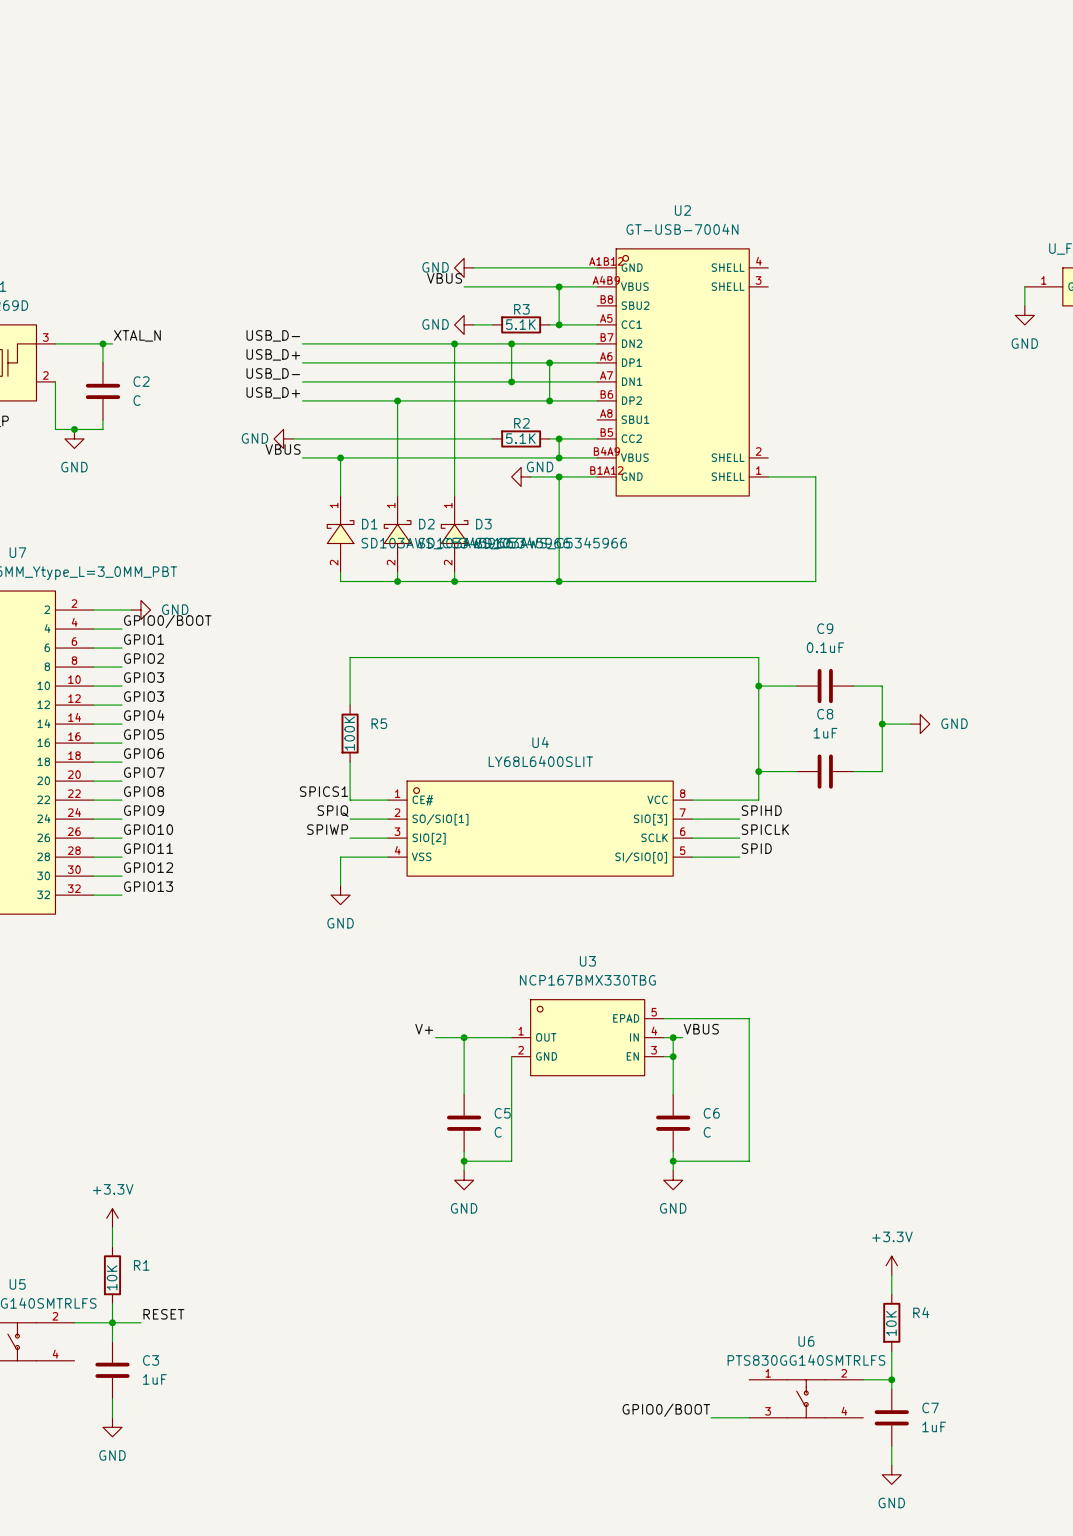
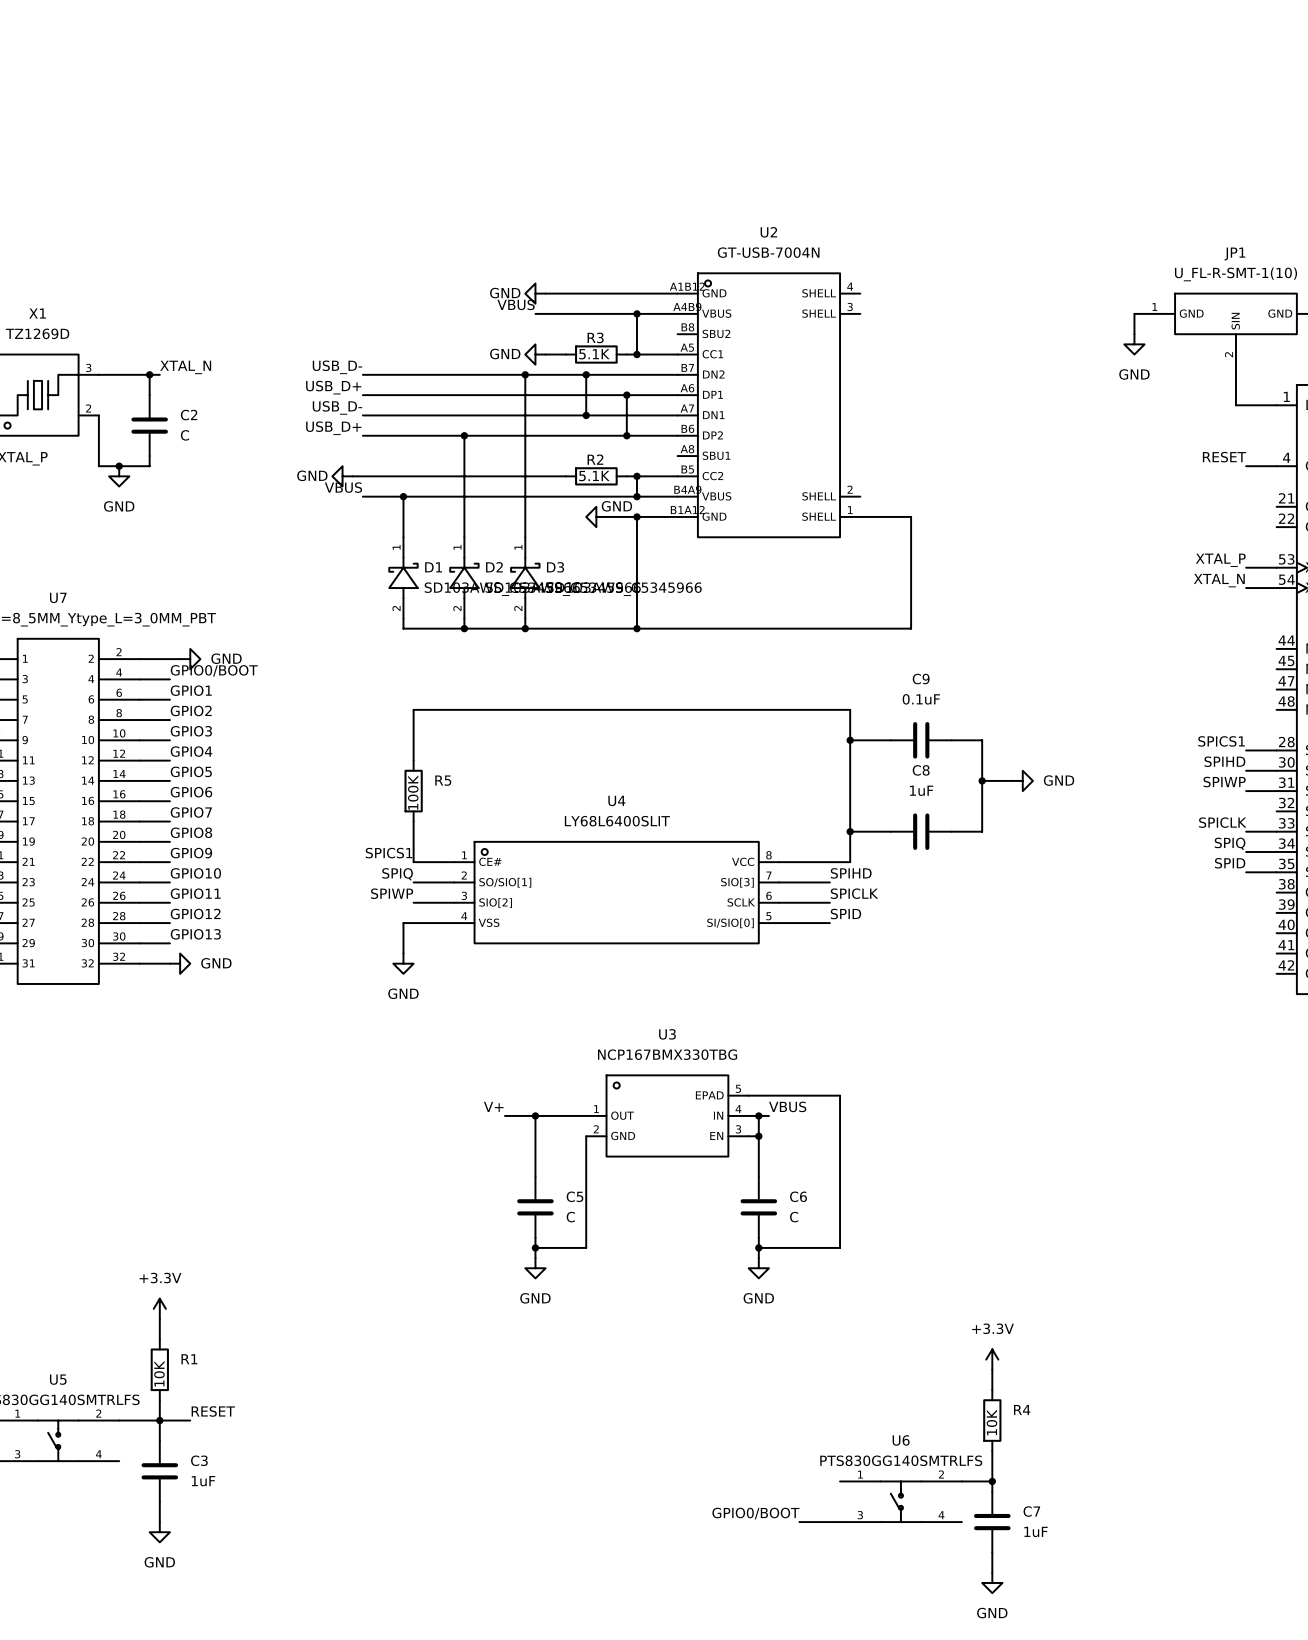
label: GPIO3 (144, 696) -> GPIO4 (191, 751)
label: GPIO4 (144, 715) -> GPIO5 (191, 771)
label: GPIO5 (144, 734) -> GPIO6 (191, 792)
label: GPIO6 (144, 753) -> GPIO7 (191, 812)
label: GPIO7 (144, 772) -> GPIO8 (191, 832)
label: GPIO8 (144, 791) -> GPIO9 (191, 853)
label: GPIO9 (144, 810) -> GPIO10 (195, 873)
label: GPIO10 (148, 829) -> GPIO11 (195, 893)
label: GPIO11 (148, 848) -> GPIO12 (195, 914)
label: GPIO12 (148, 867) -> GPIO13 (195, 934)
label: GPIO13 (148, 886) -> none
power symbol: none -> GND (180, 963)

